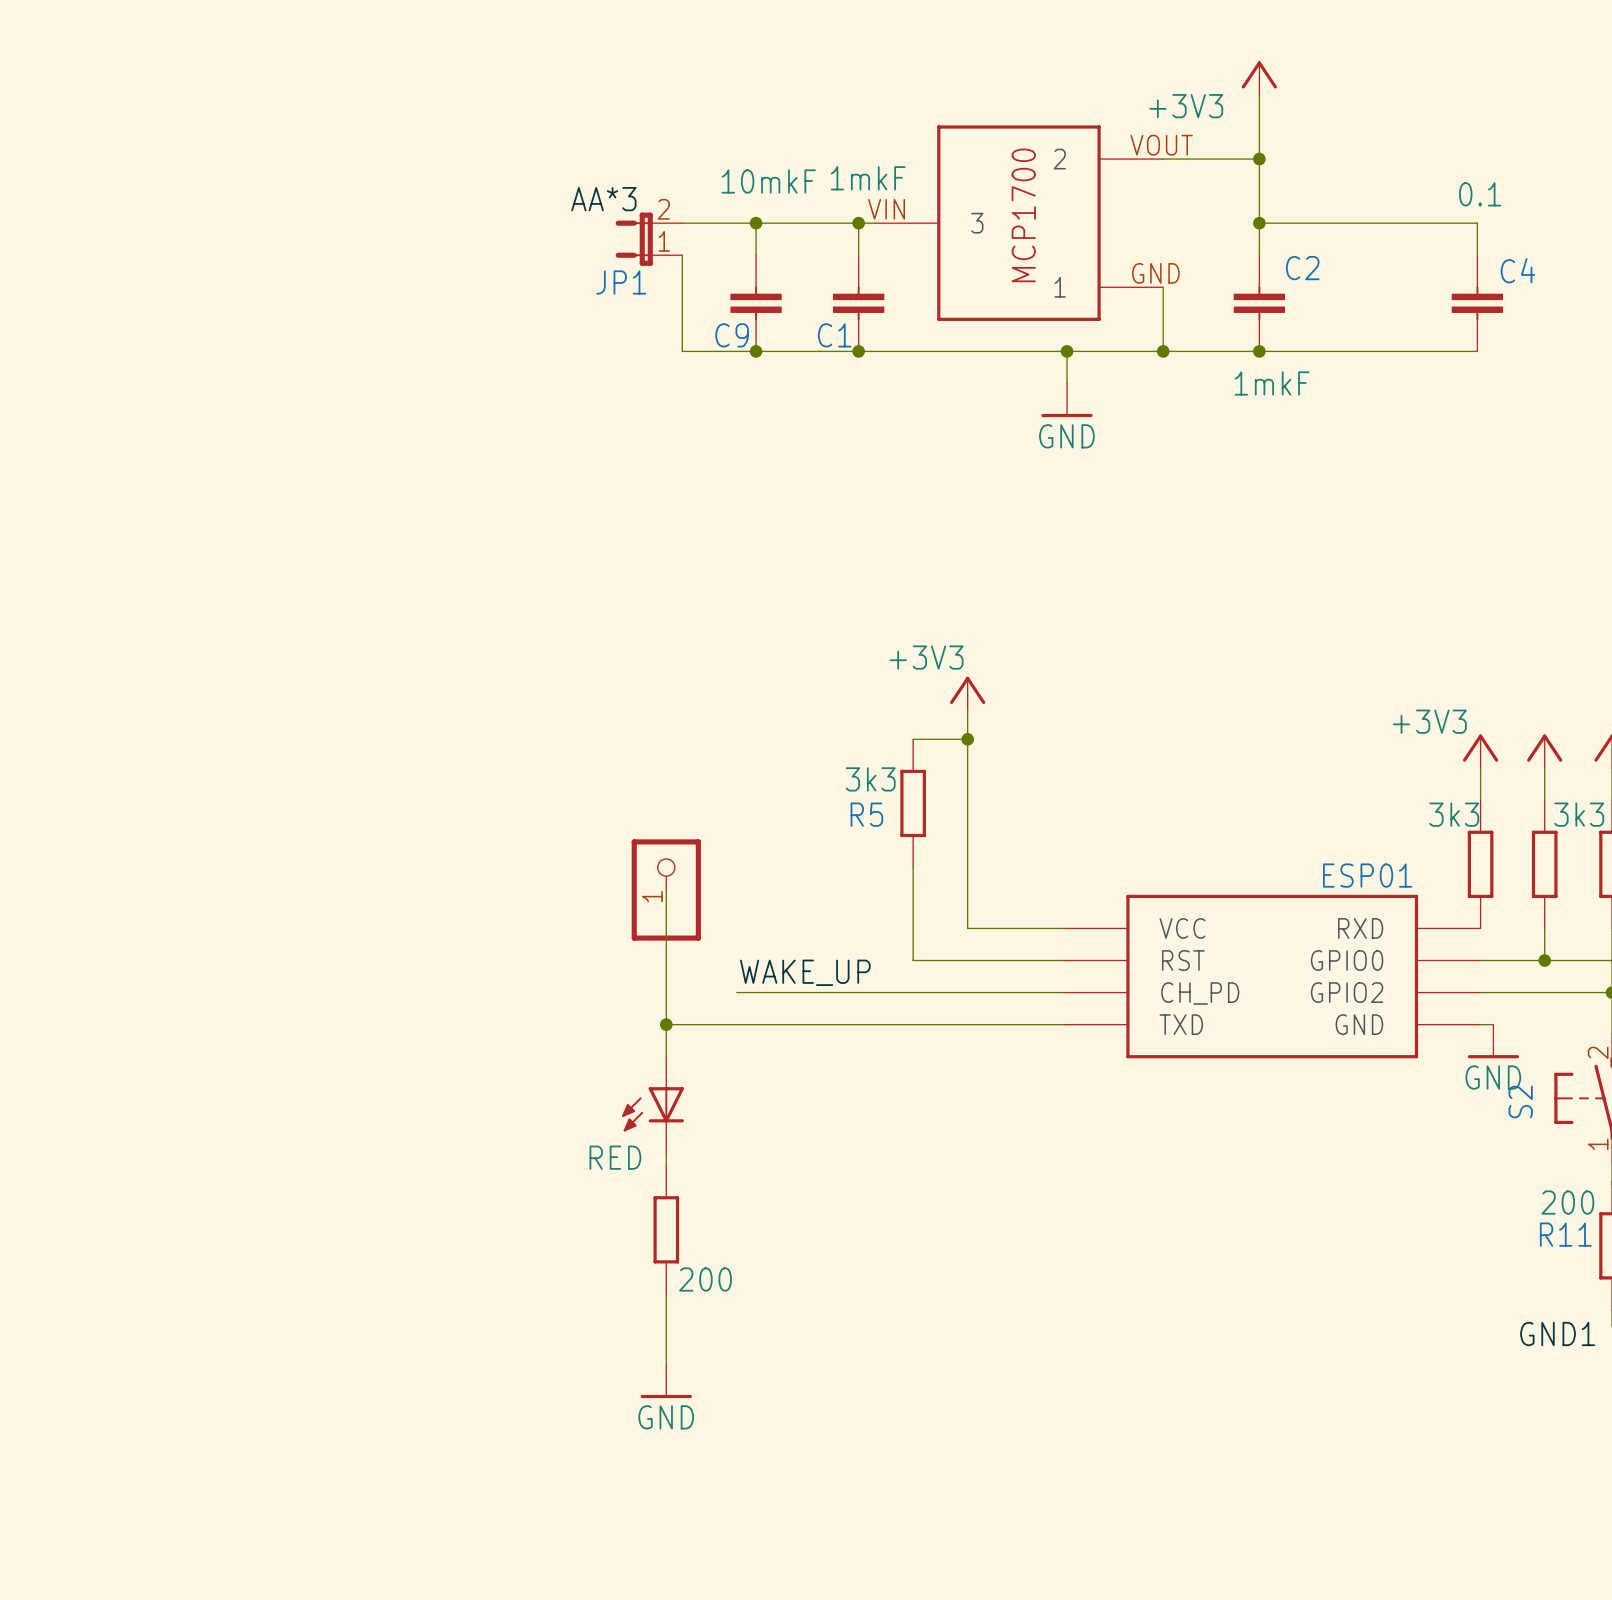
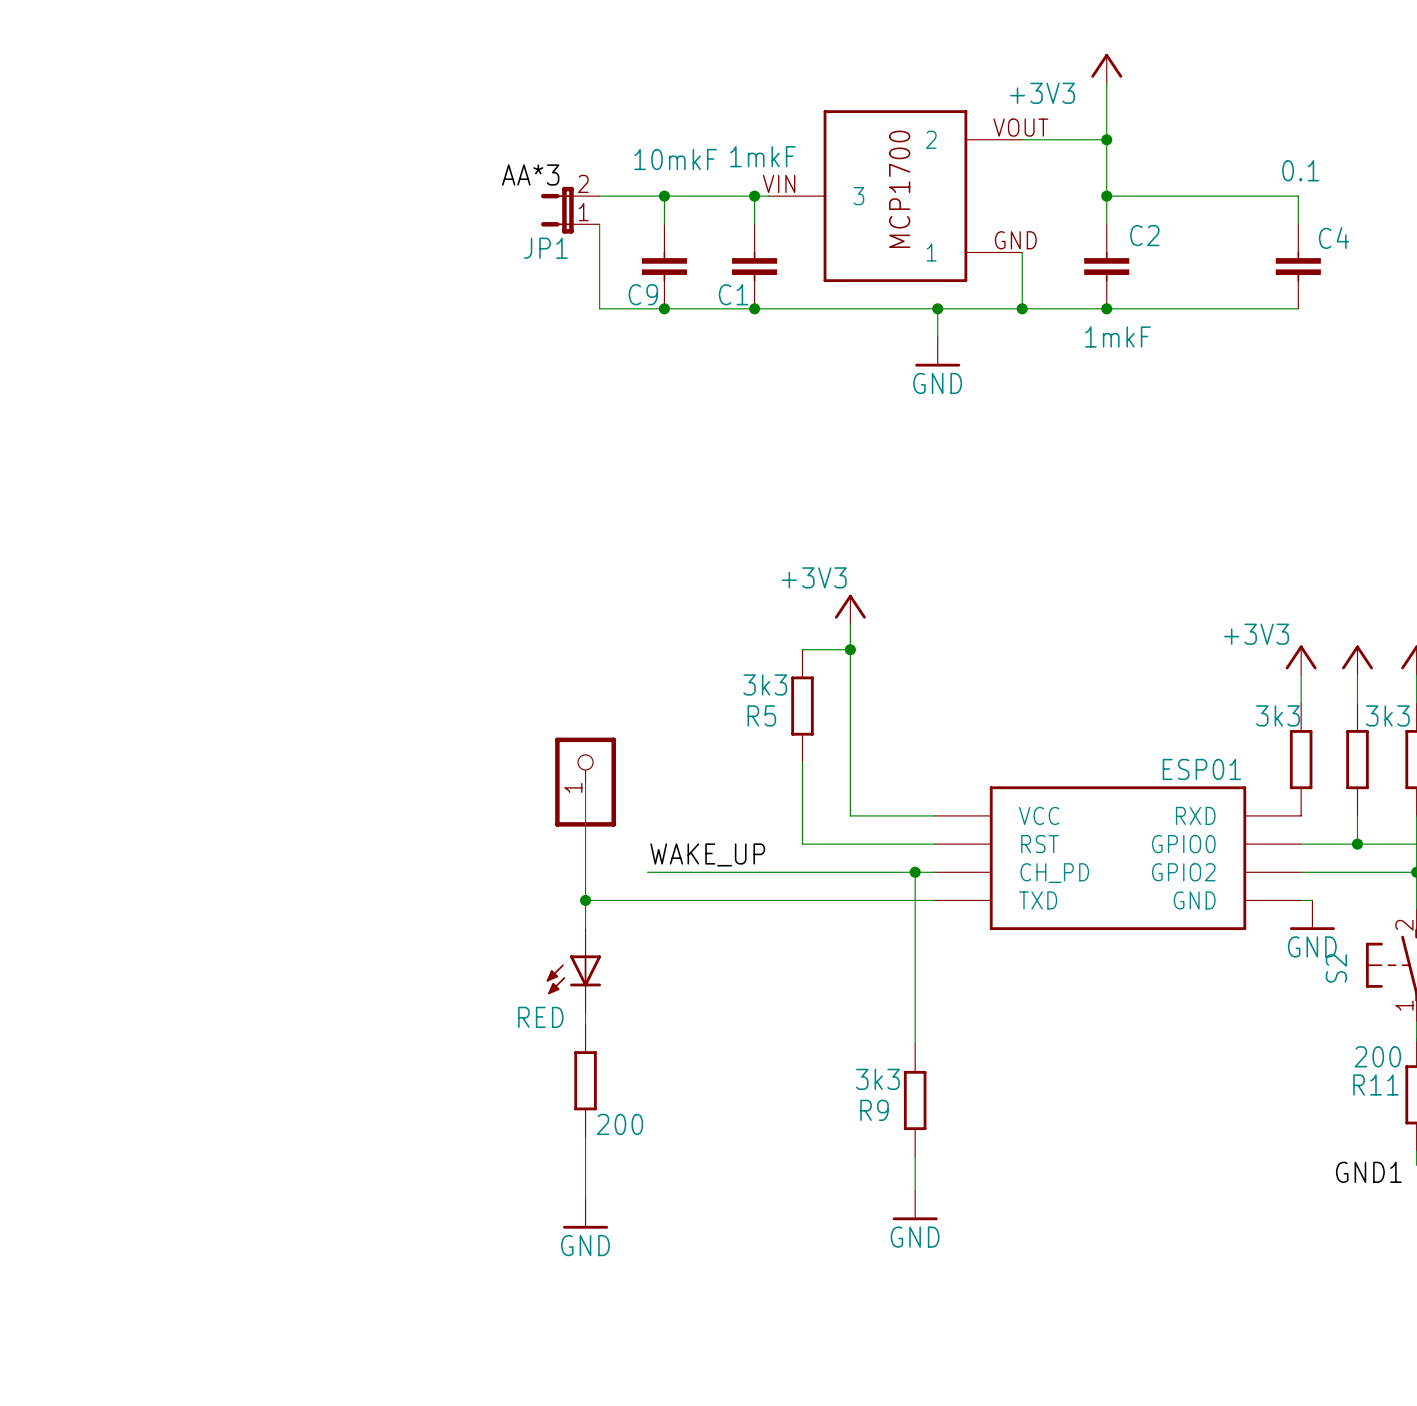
wire: none -> (915, 872) (915, 1044)
junction: none -> (915, 872)
R9: none -> 3k3 (915, 1100)
wire: none -> (915, 1156) (915, 1190)
power symbol: none -> GND (915, 1205)

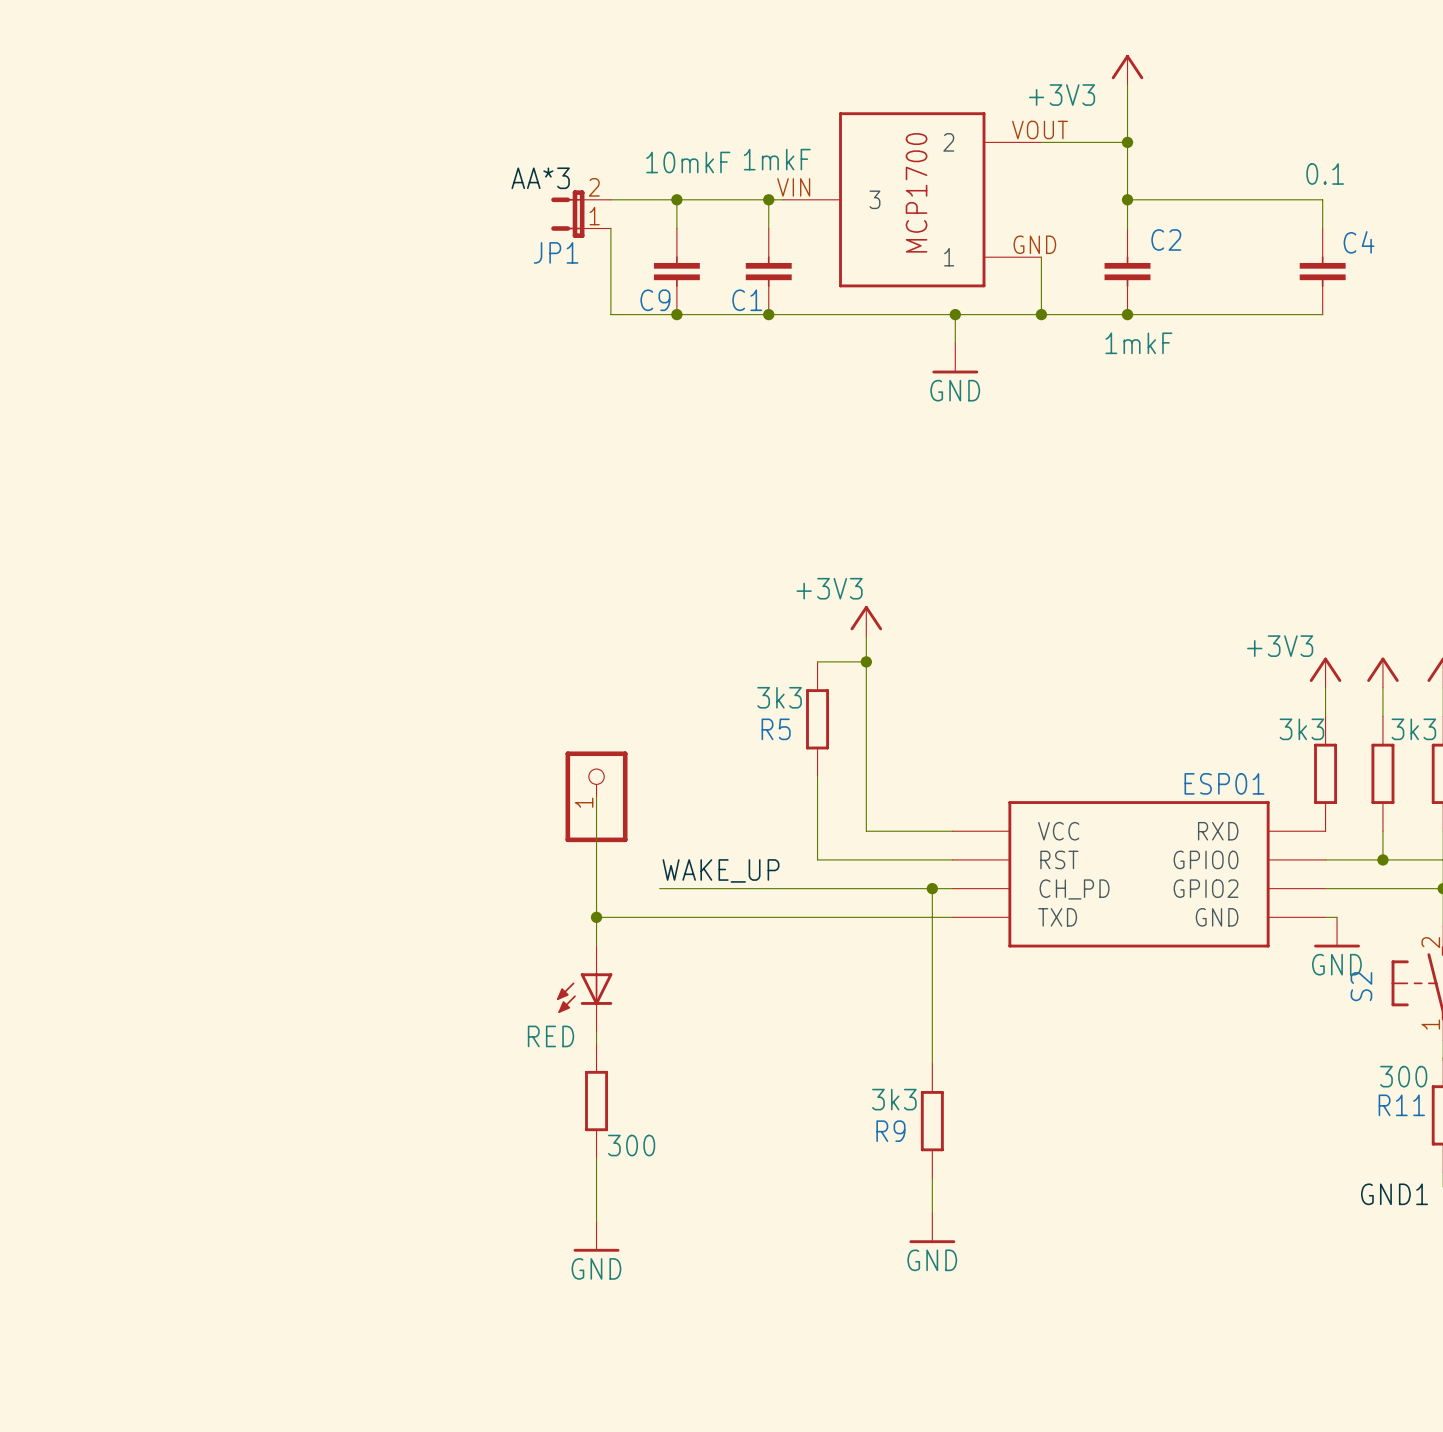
R11 value: 200 (1377, 1056) -> 300 (1403, 1076)
part value: 200 (619, 1124) -> 300 (631, 1145)

